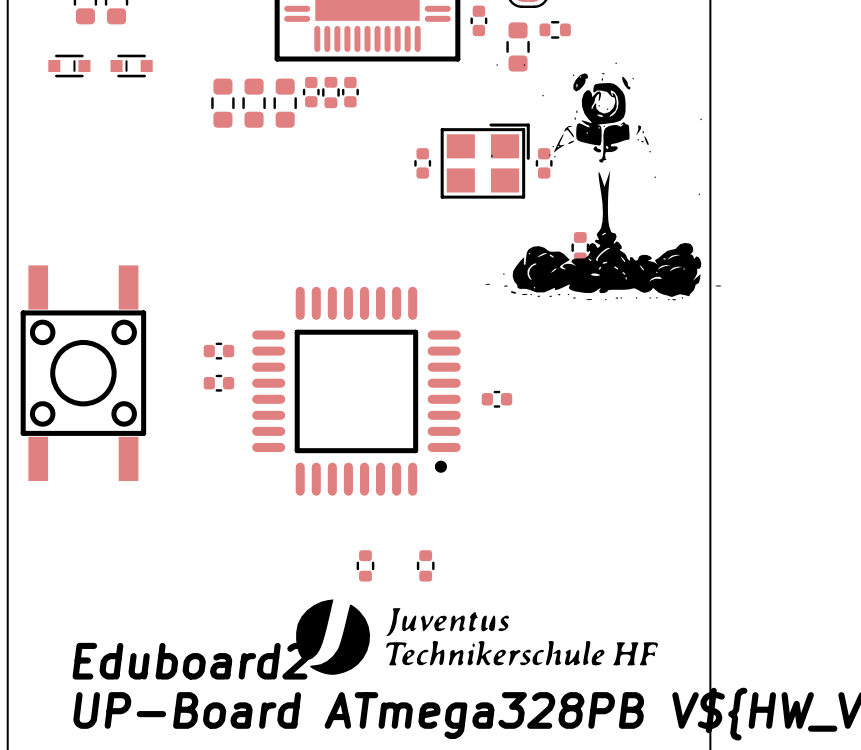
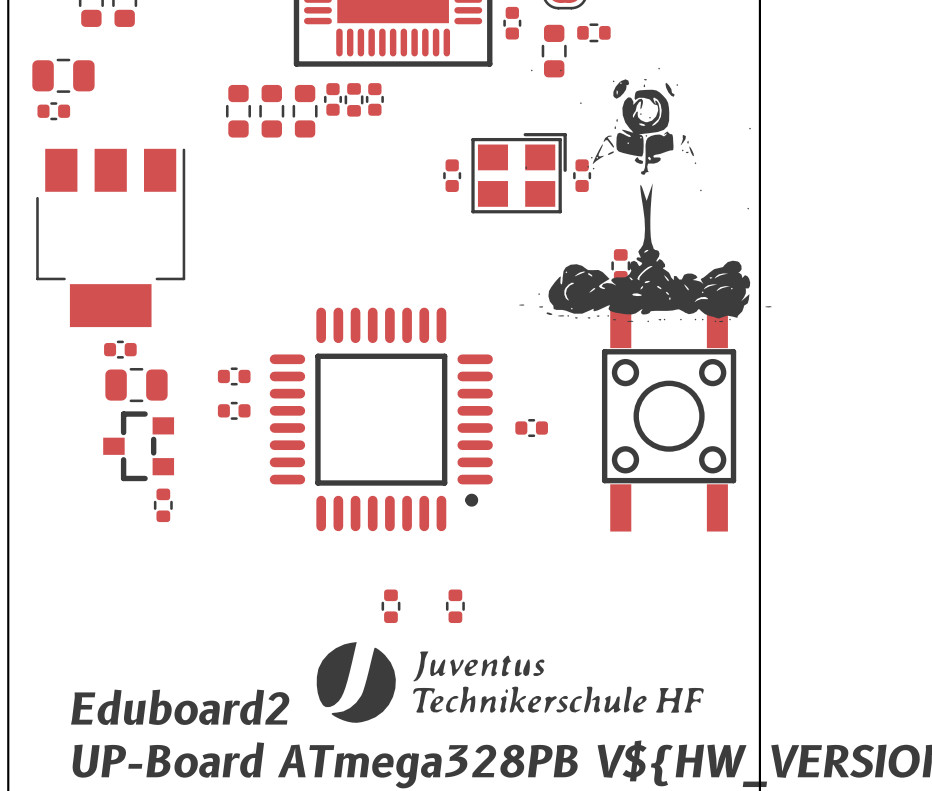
part footprint: [48, 54, 91, 78] -> [32, 58, 95, 93]
part: (131, 66) -> none
part: none -> (53, 111)
part: none -> (110, 237)
part: none -> (120, 349)
part: none -> (136, 385)
part: (83, 373) -> none
part: none -> (669, 416)
part: none -> (138, 446)
part: none -> (163, 505)

